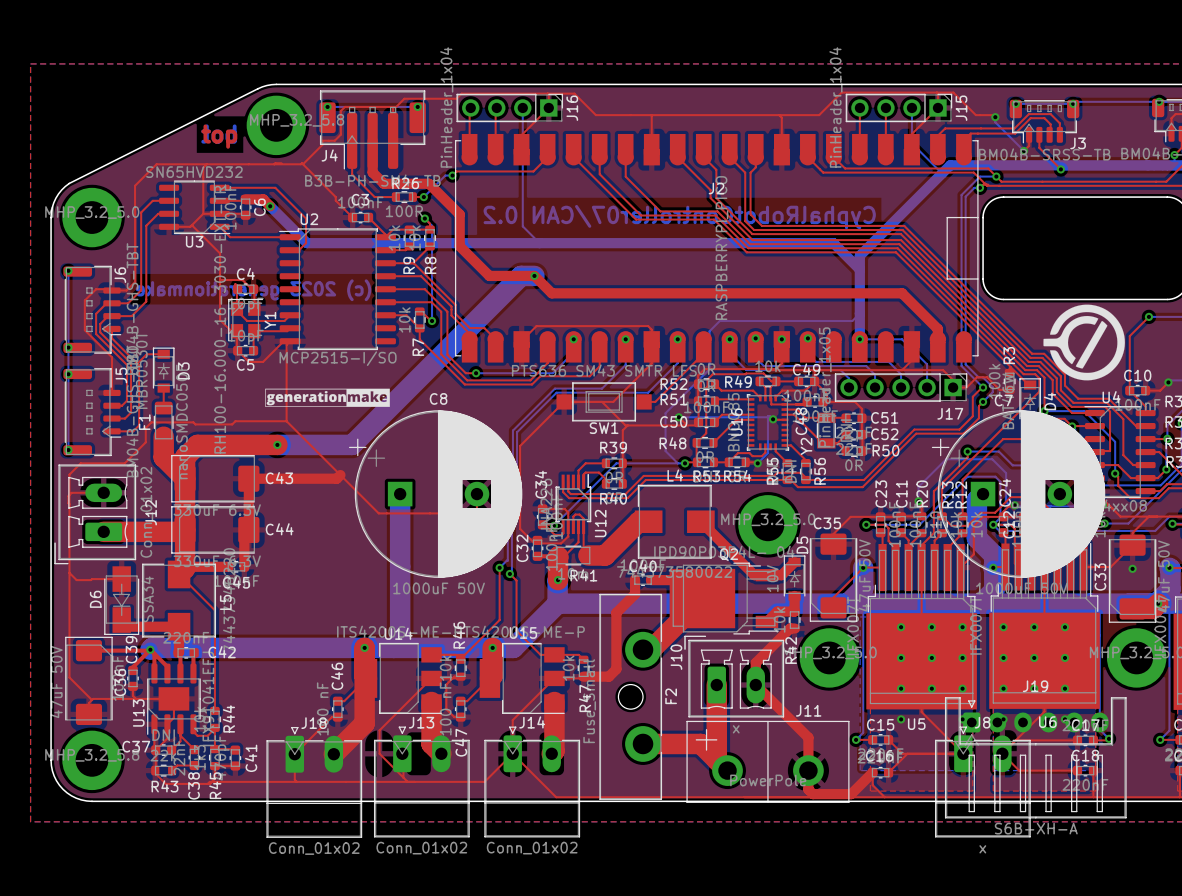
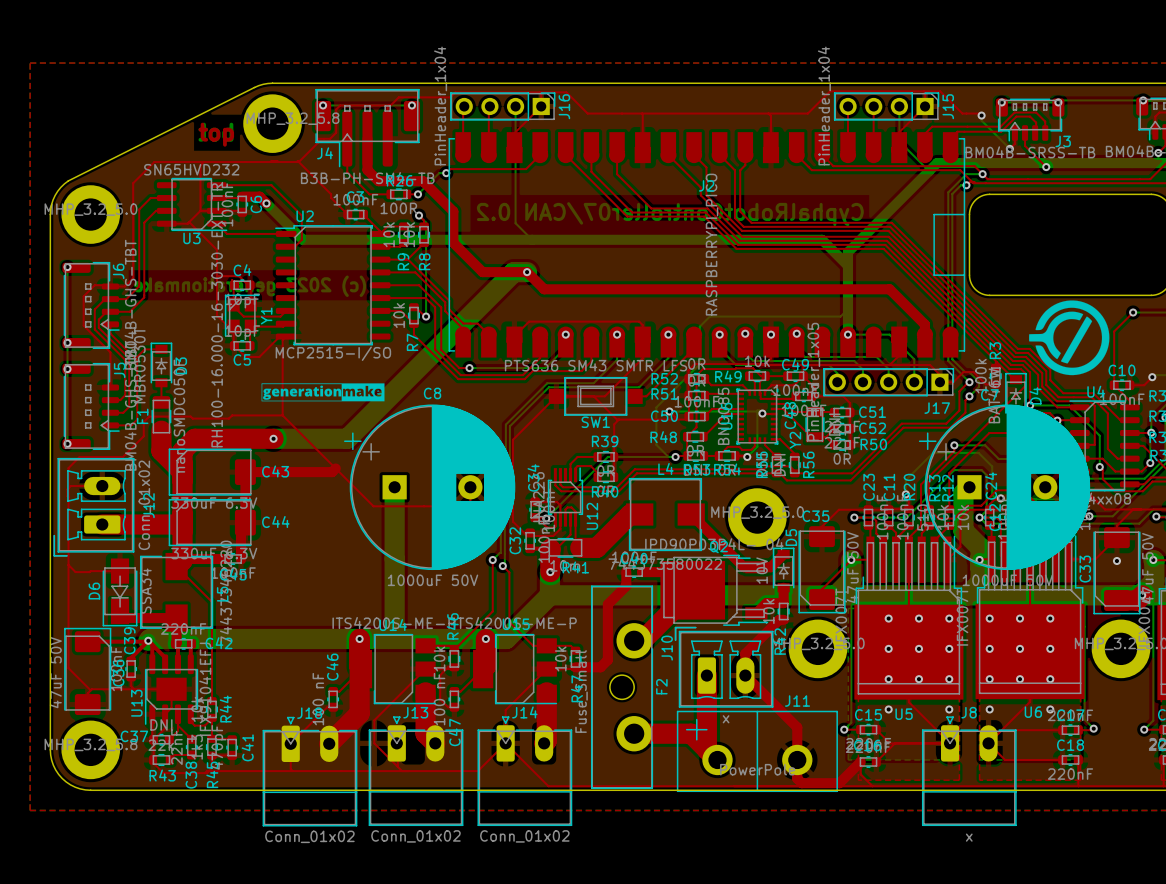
J19: S6B-XH-A (1035, 757) -> none

